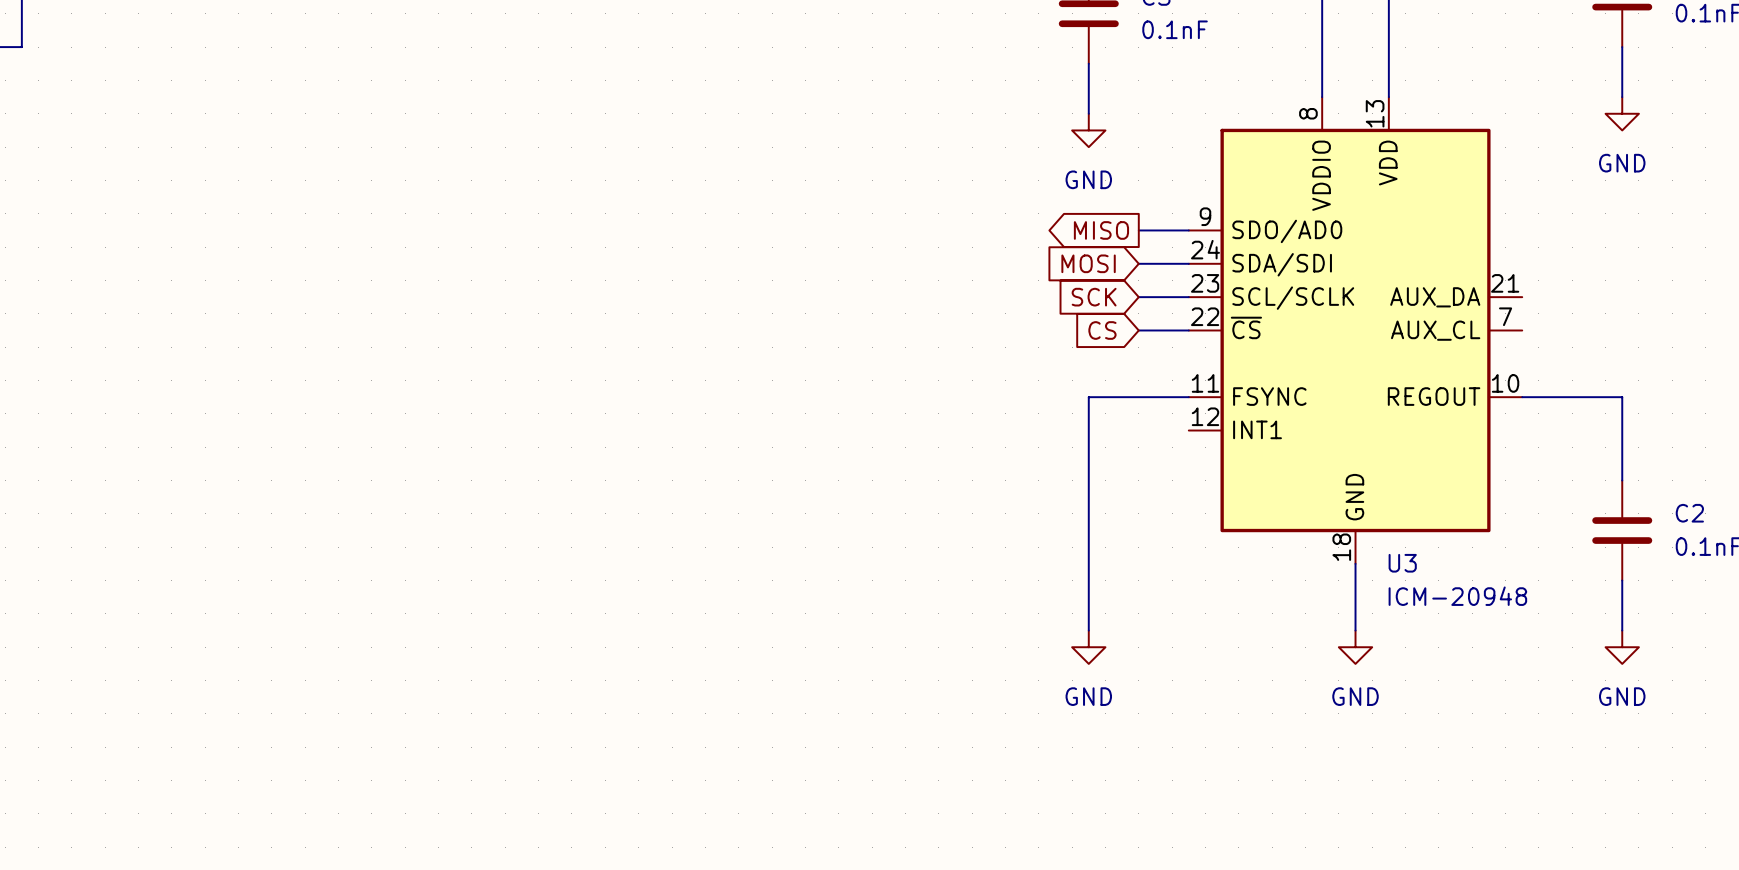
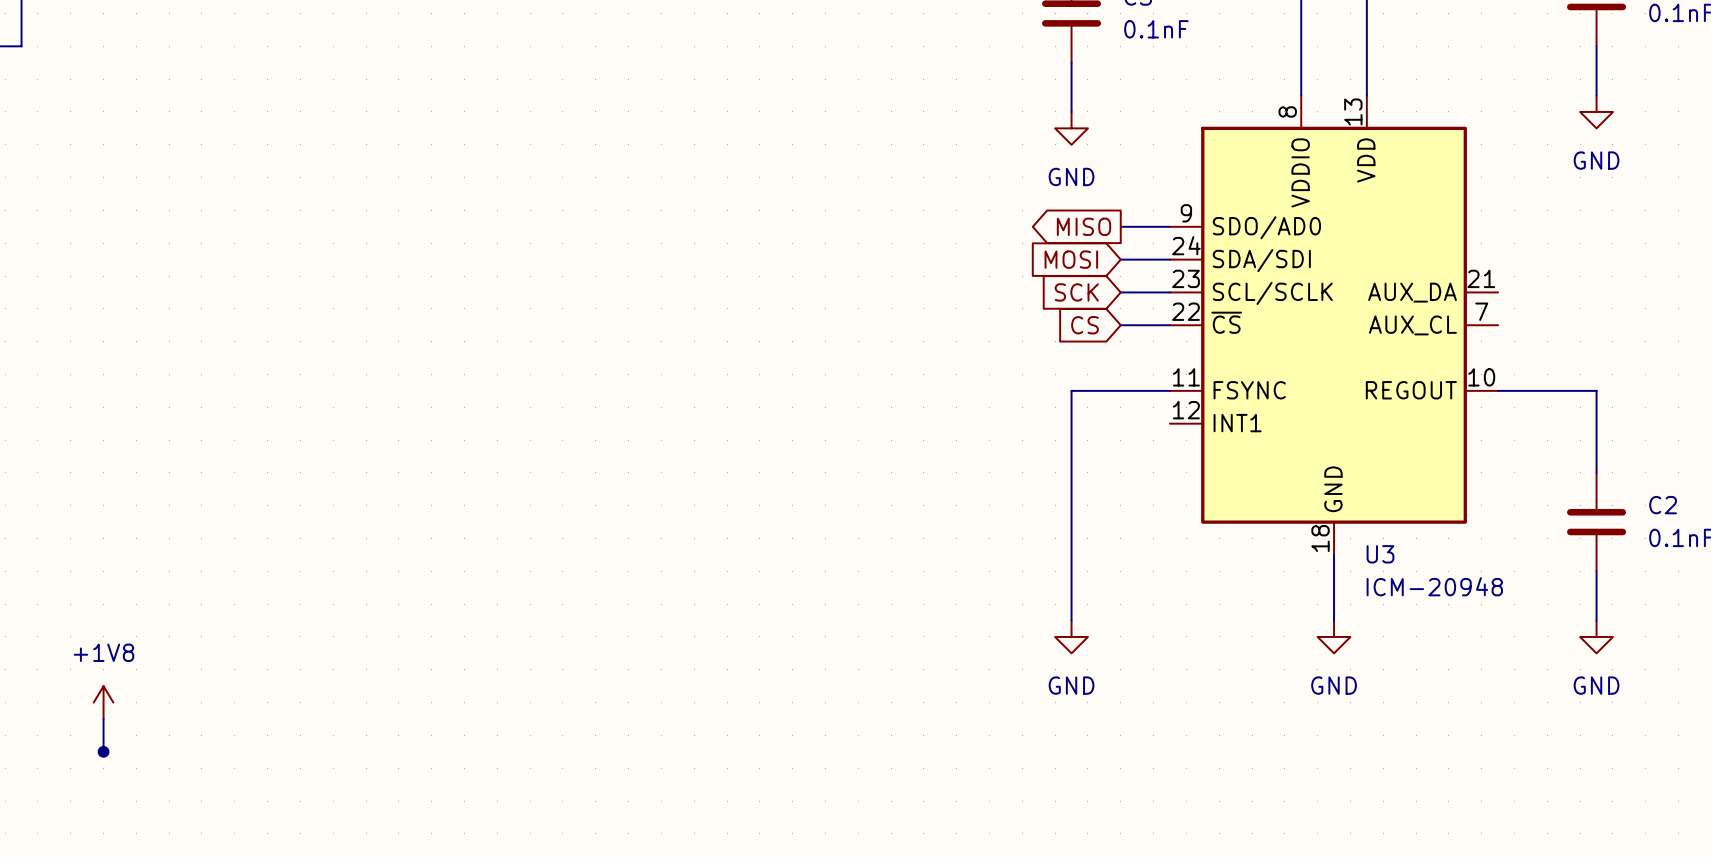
power symbol: none -> +1V8 (103, 702)
wire: none -> (103, 719) (103, 751)
junction: none -> (103, 751)

